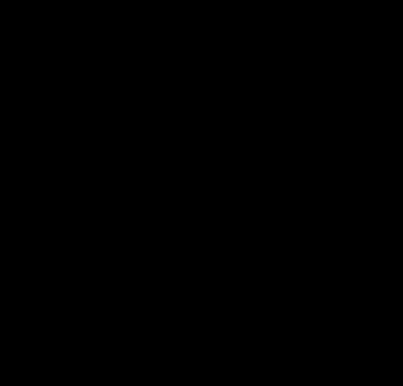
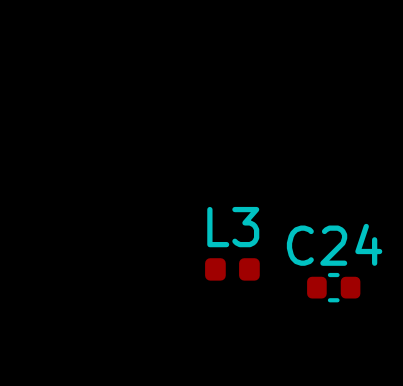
L3: none -> (232, 269)
C24: none -> (333, 287)

